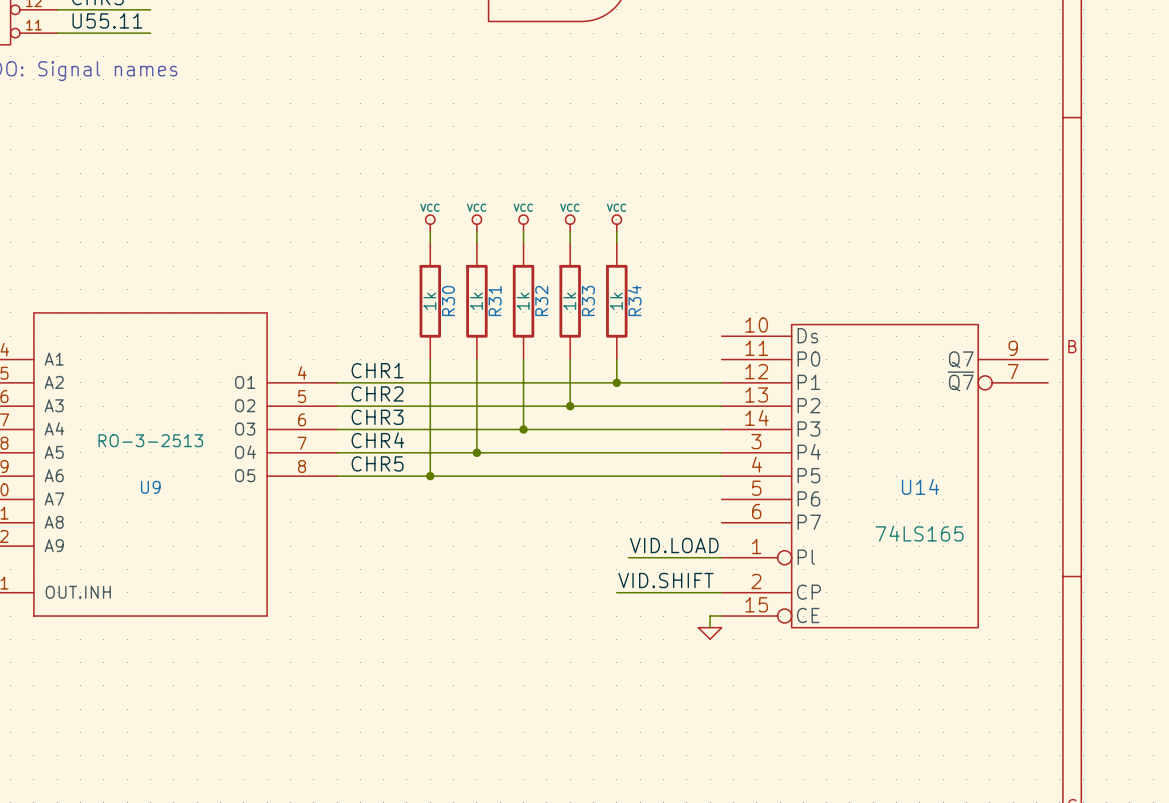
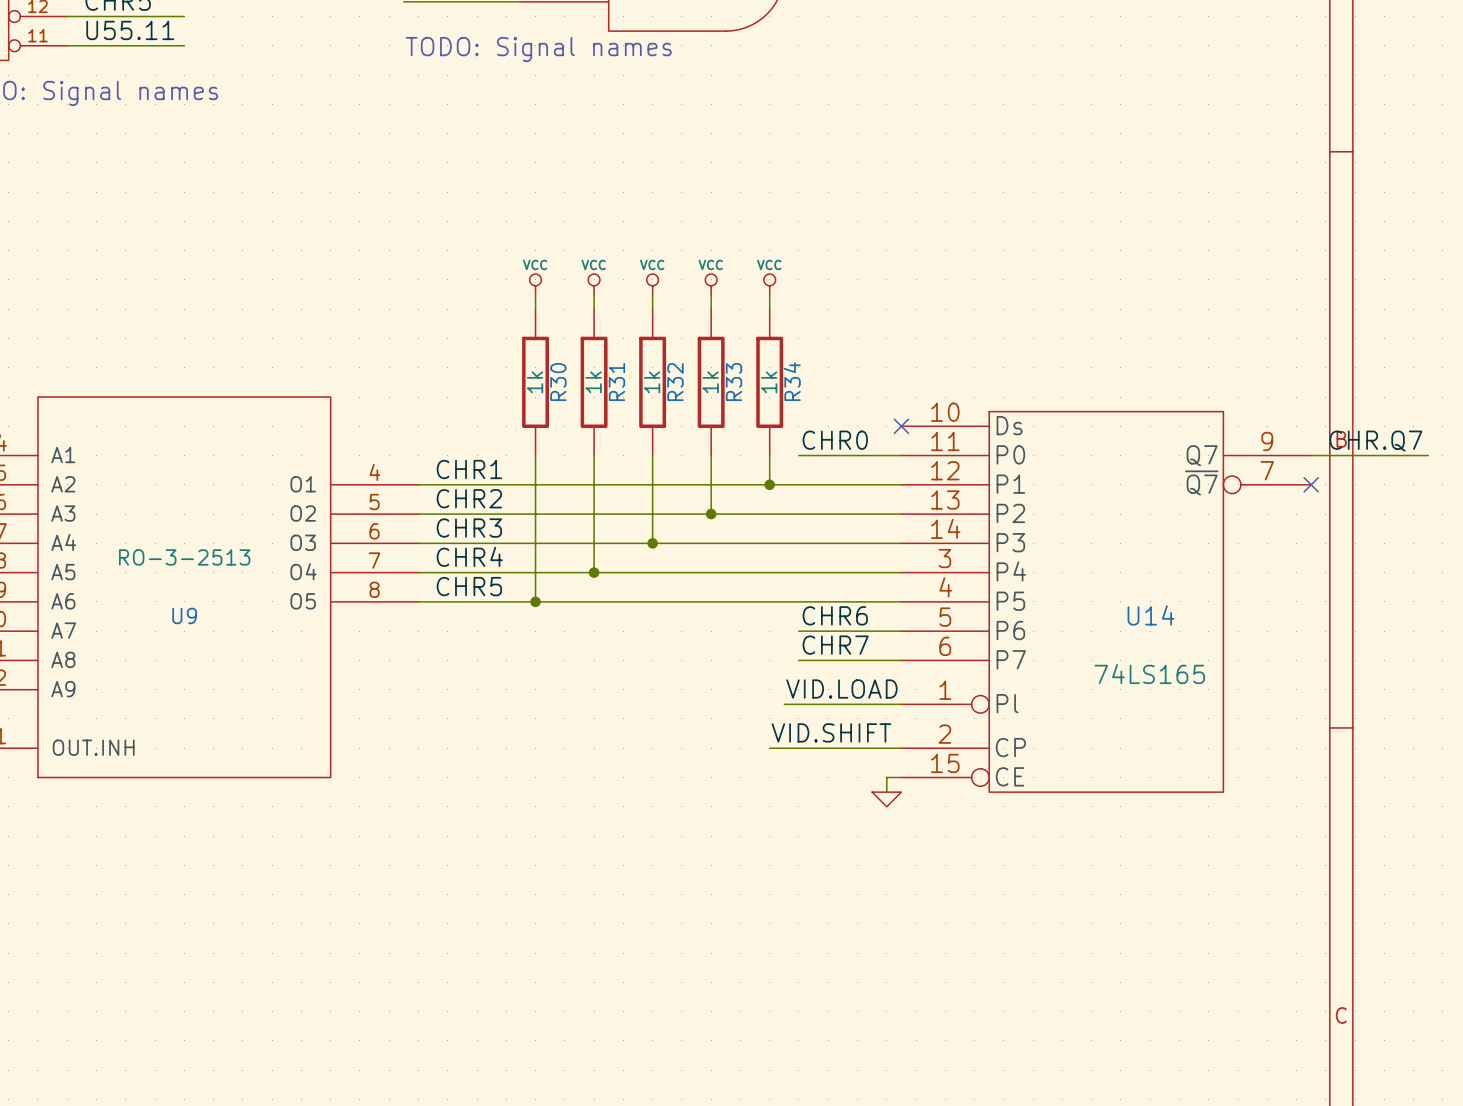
text: none -> TODO: Signal names (538, 49)
no-connect mark: none -> (901, 426)
label: none -> CHR0 (835, 440)
label: none -> CHR.Q7 (1375, 441)
wire: none -> (798, 455) (901, 455)
wire: none -> (1311, 455) (1428, 455)
no-connect mark: none -> (1311, 484)
label: none -> CHR6 (835, 615)
wire: none -> (798, 631) (901, 631)
label: none -> CHR7 (835, 645)
wire: none -> (798, 660) (901, 660)

